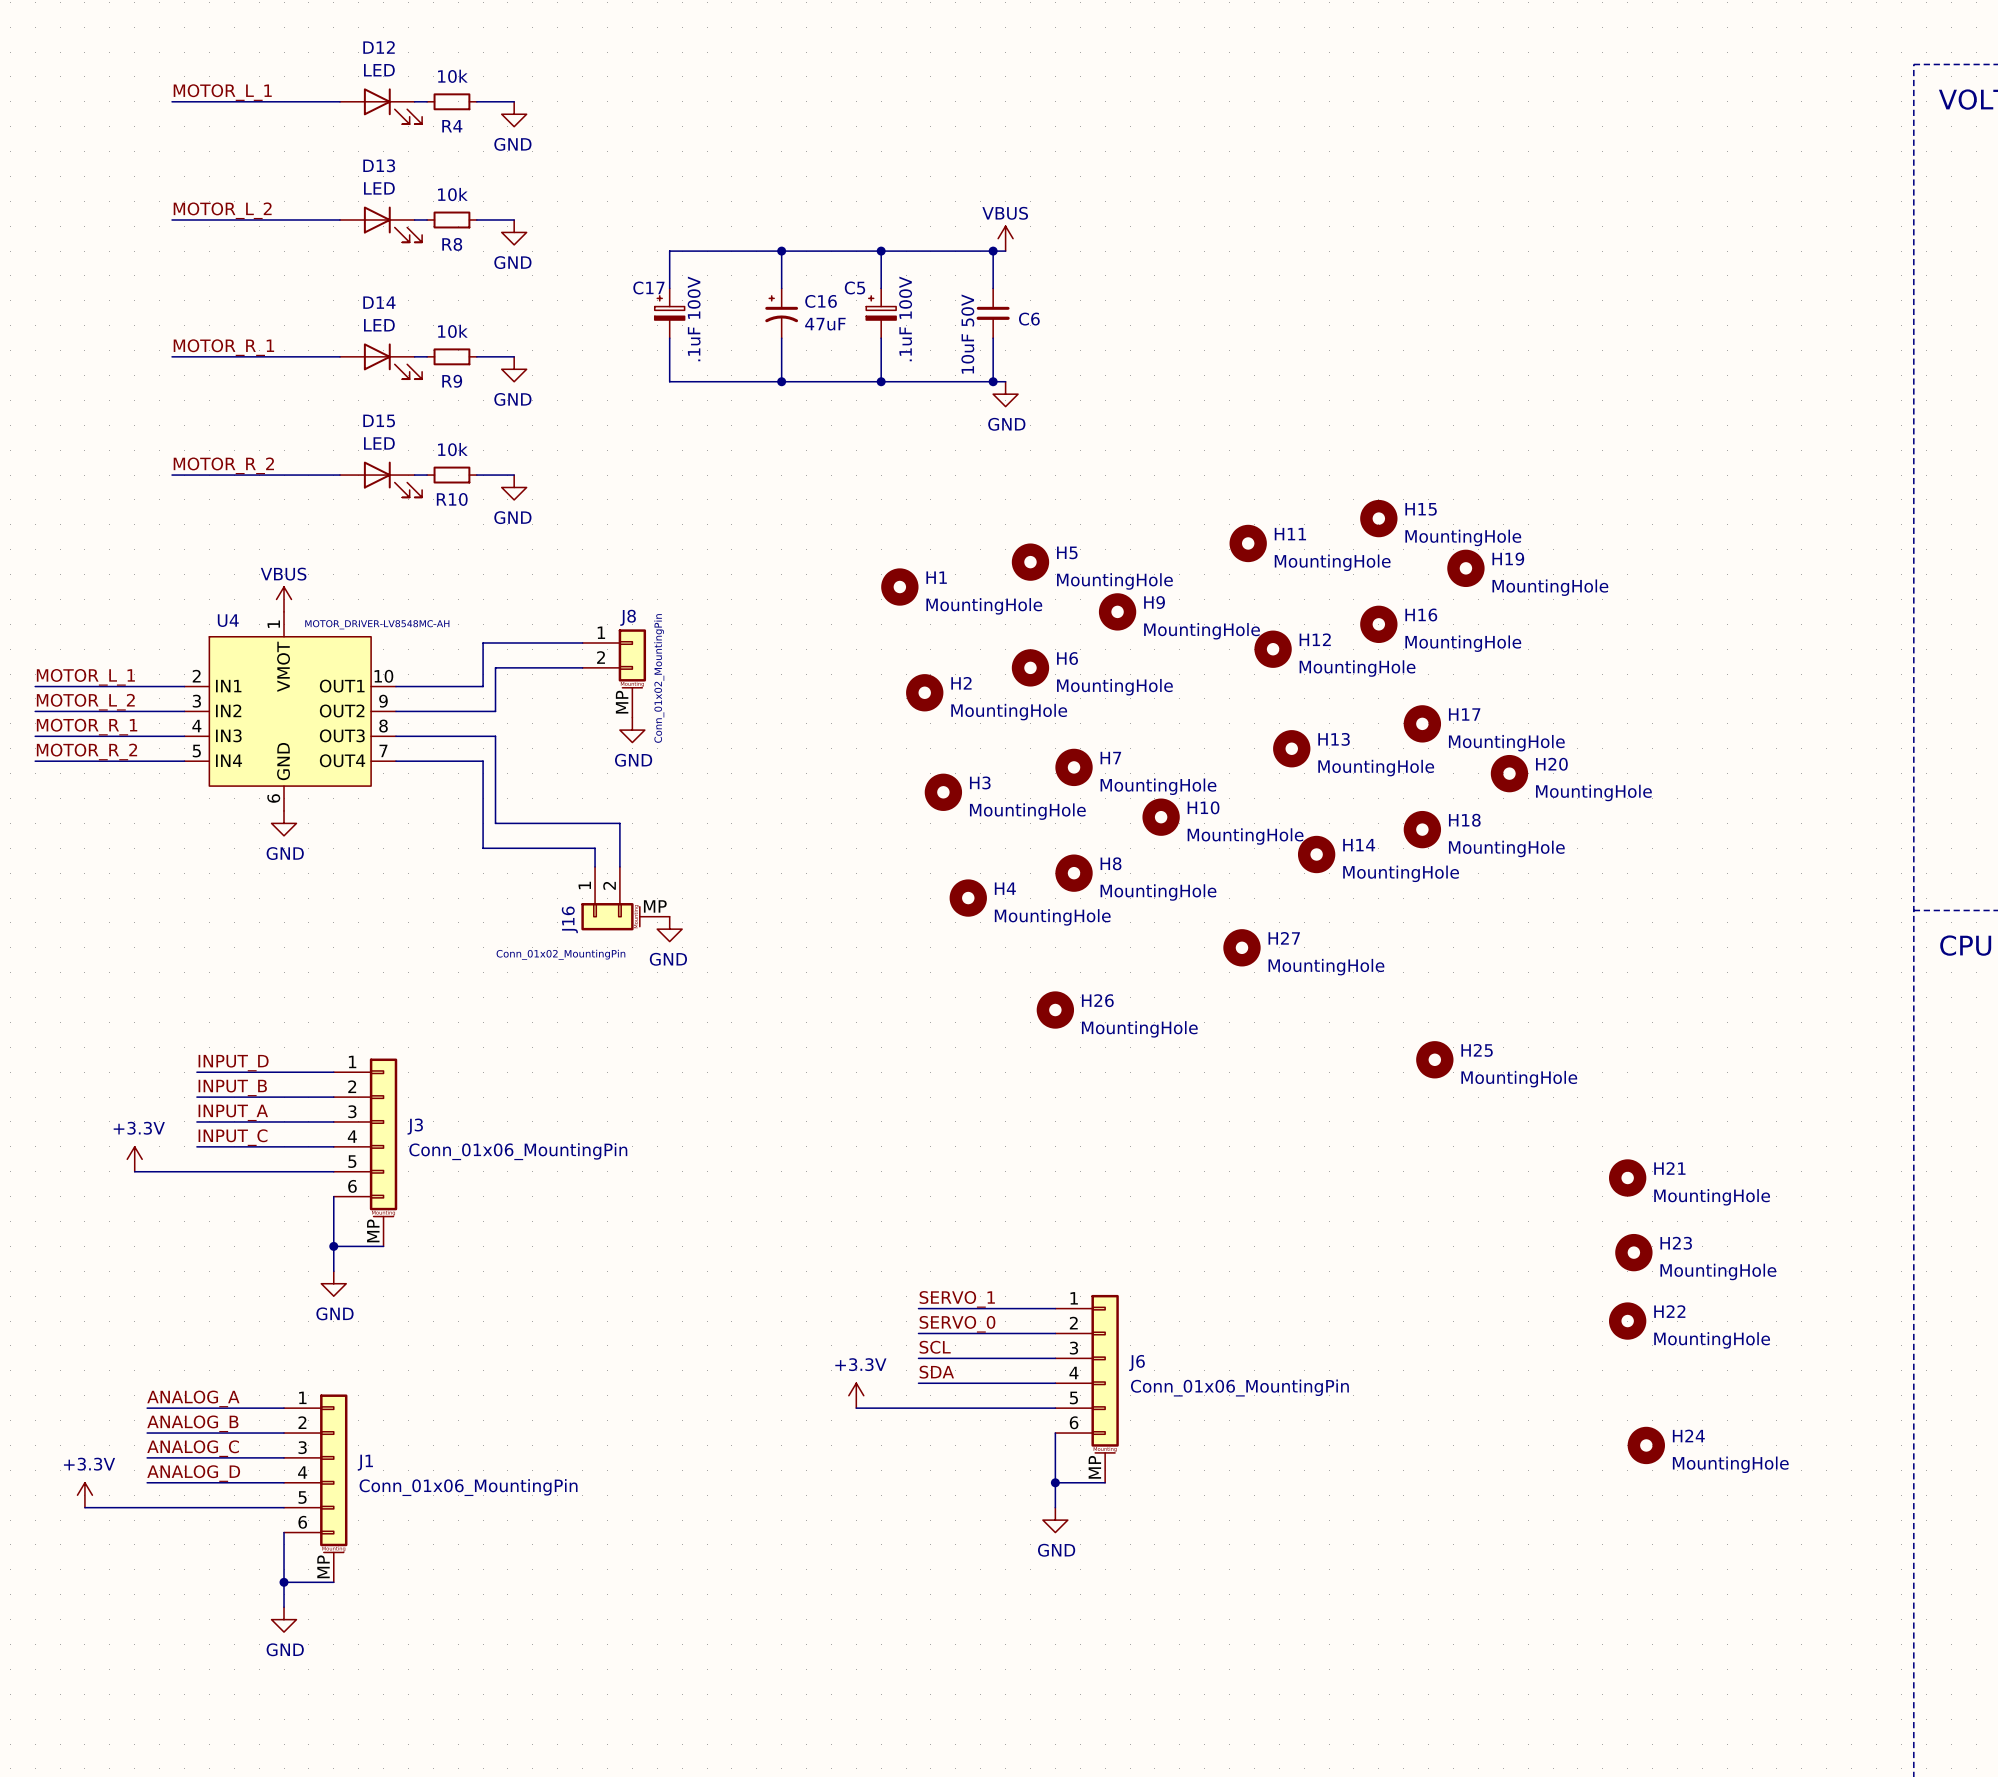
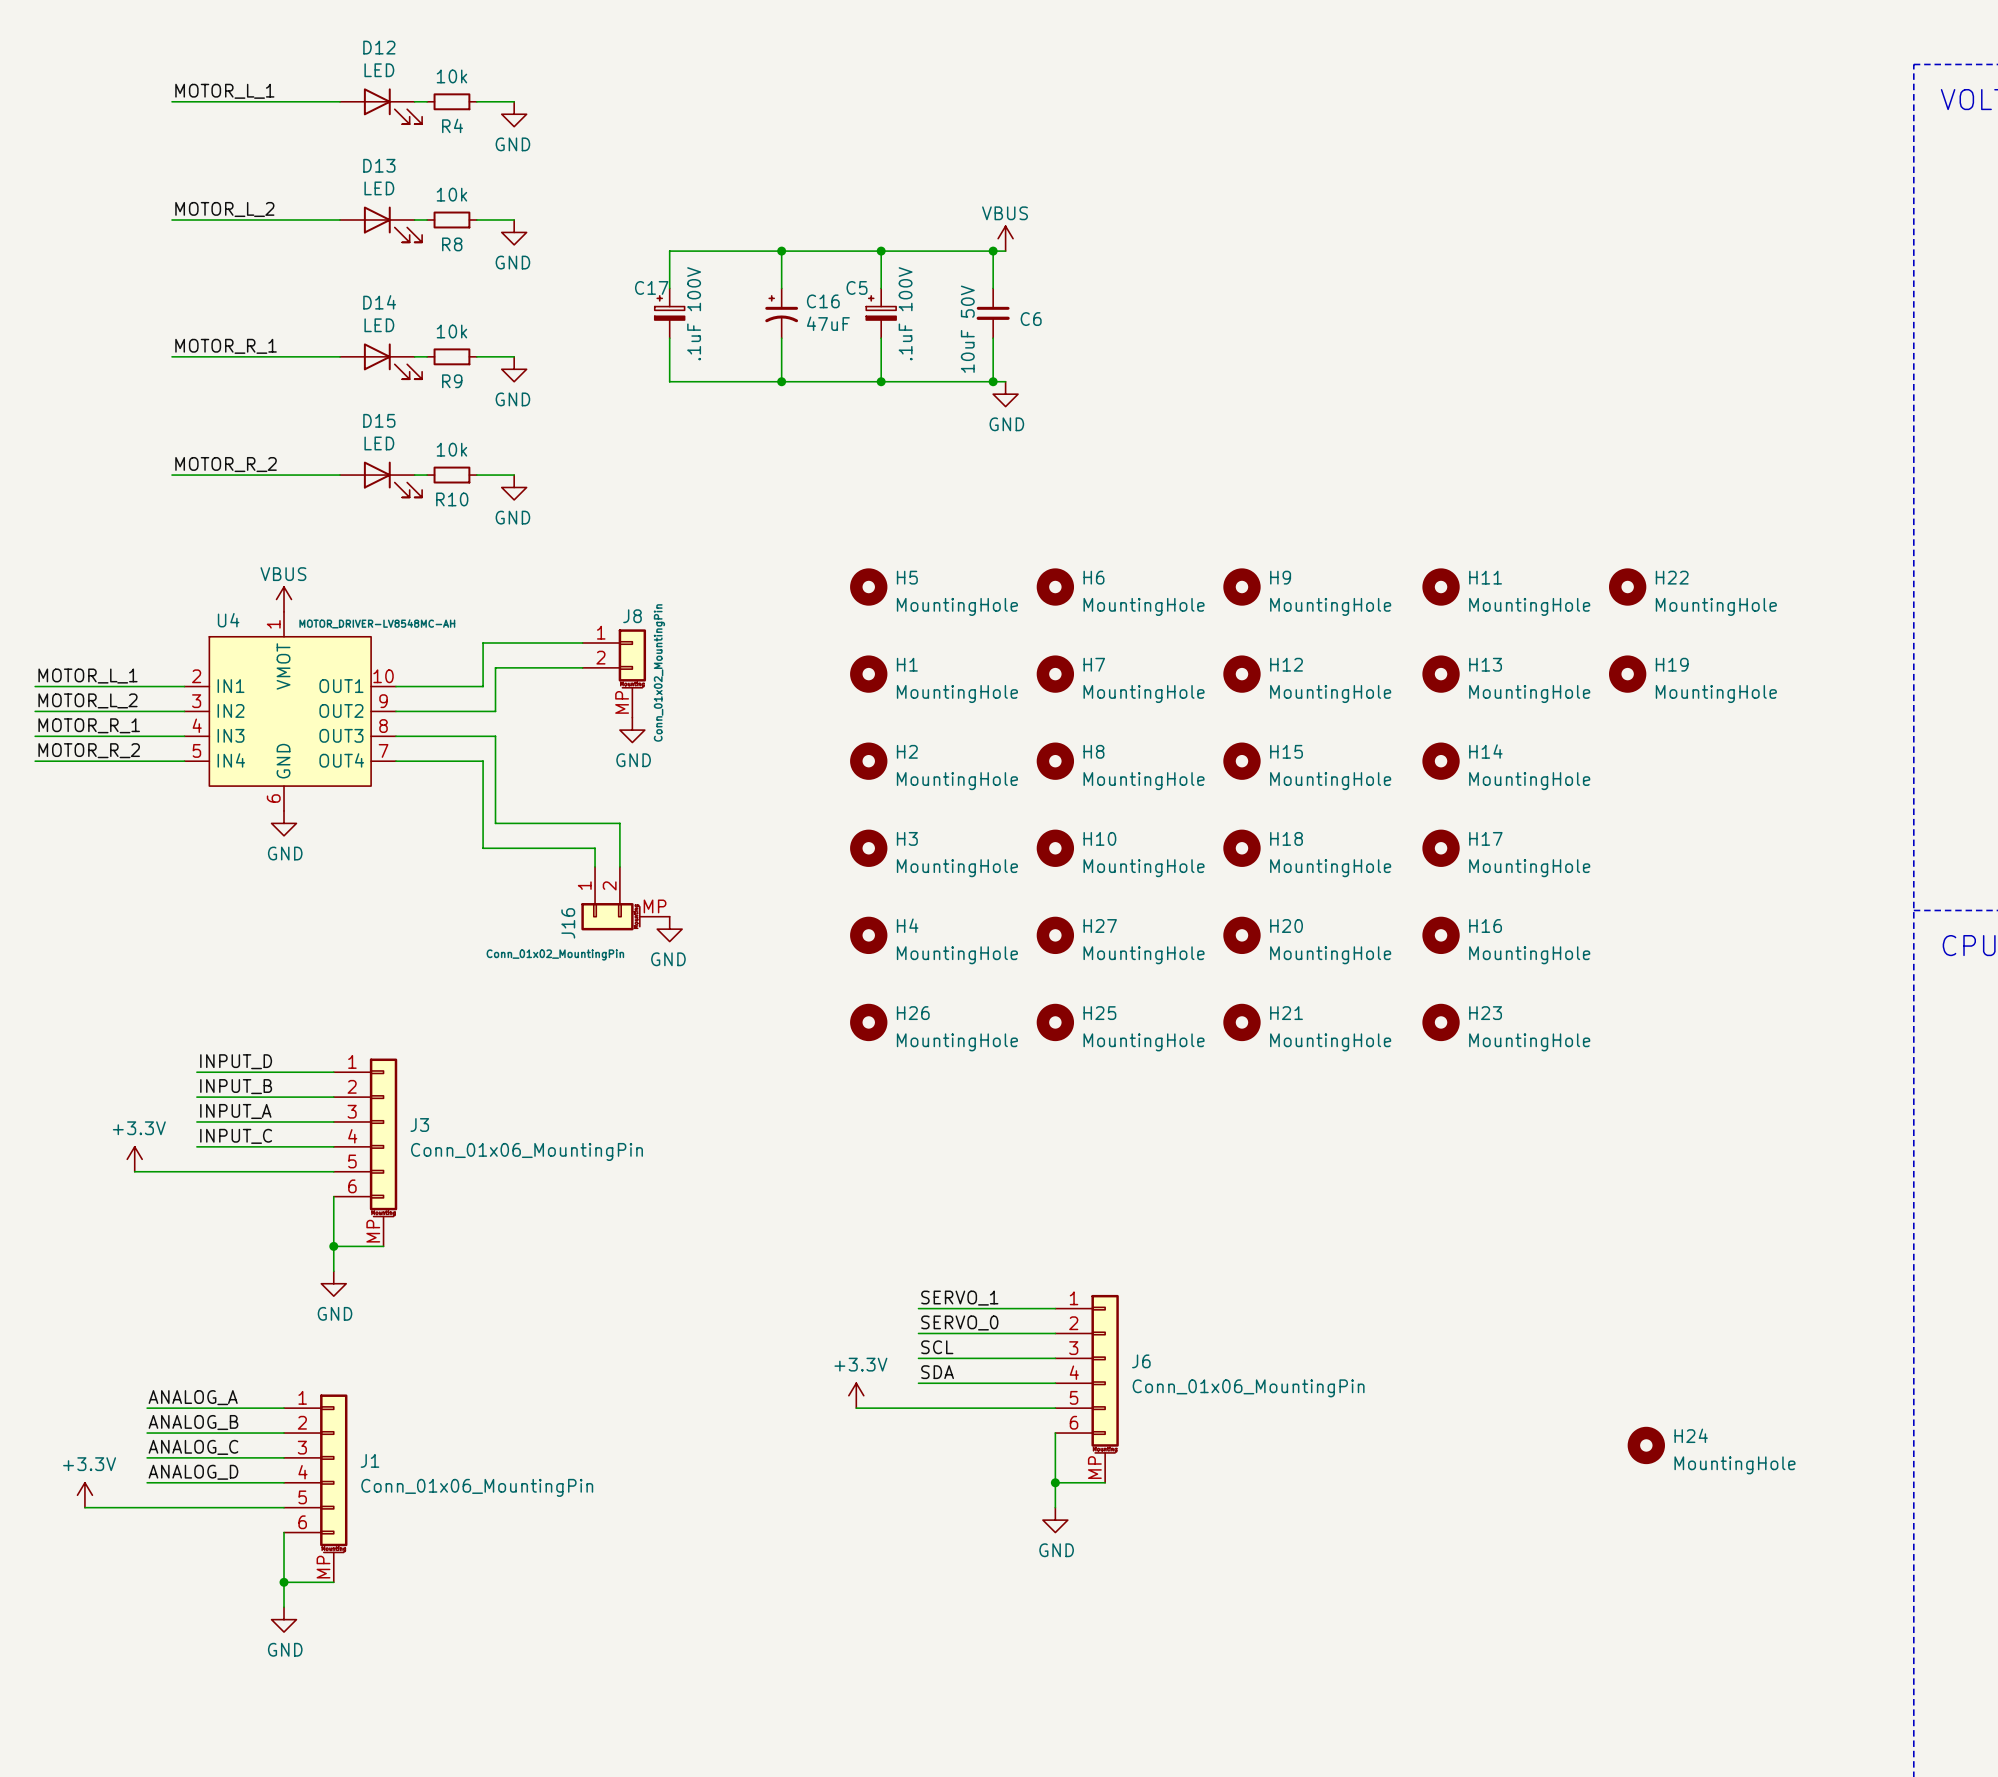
H15 position: (1378, 518) -> (1241, 761)
H11 position: (1248, 543) -> (1441, 587)
H5 position: (1030, 562) -> (868, 587)
H19 position: (1465, 568) -> (1627, 674)
H1 position: (899, 587) -> (868, 674)
H9 position: (1117, 611) -> (1241, 587)
H16 position: (1378, 624) -> (1441, 935)
H12 position: (1273, 649) -> (1241, 674)
H6 position: (1030, 667) -> (1055, 587)
H2 position: (924, 692) -> (868, 761)
H17 position: (1422, 723) -> (1441, 848)
H13 position: (1291, 748) -> (1441, 674)
H7 position: (1074, 767) -> (1055, 674)
H20 position: (1509, 773) -> (1241, 935)
H3 position: (943, 792) -> (868, 848)
H10 position: (1161, 817) -> (1055, 848)
H18 position: (1422, 829) -> (1241, 848)
H14 position: (1316, 854) -> (1441, 761)
H8 position: (1074, 873) -> (1055, 761)
H4 position: (968, 898) -> (868, 935)
H27 position: (1241, 947) -> (1055, 935)
H26 position: (1055, 1010) -> (868, 1022)
H25 position: (1434, 1059) -> (1055, 1022)
H21 position: (1627, 1177) -> (1241, 1022)
H23 position: (1633, 1252) -> (1441, 1022)
H22 position: (1627, 1321) -> (1627, 587)

